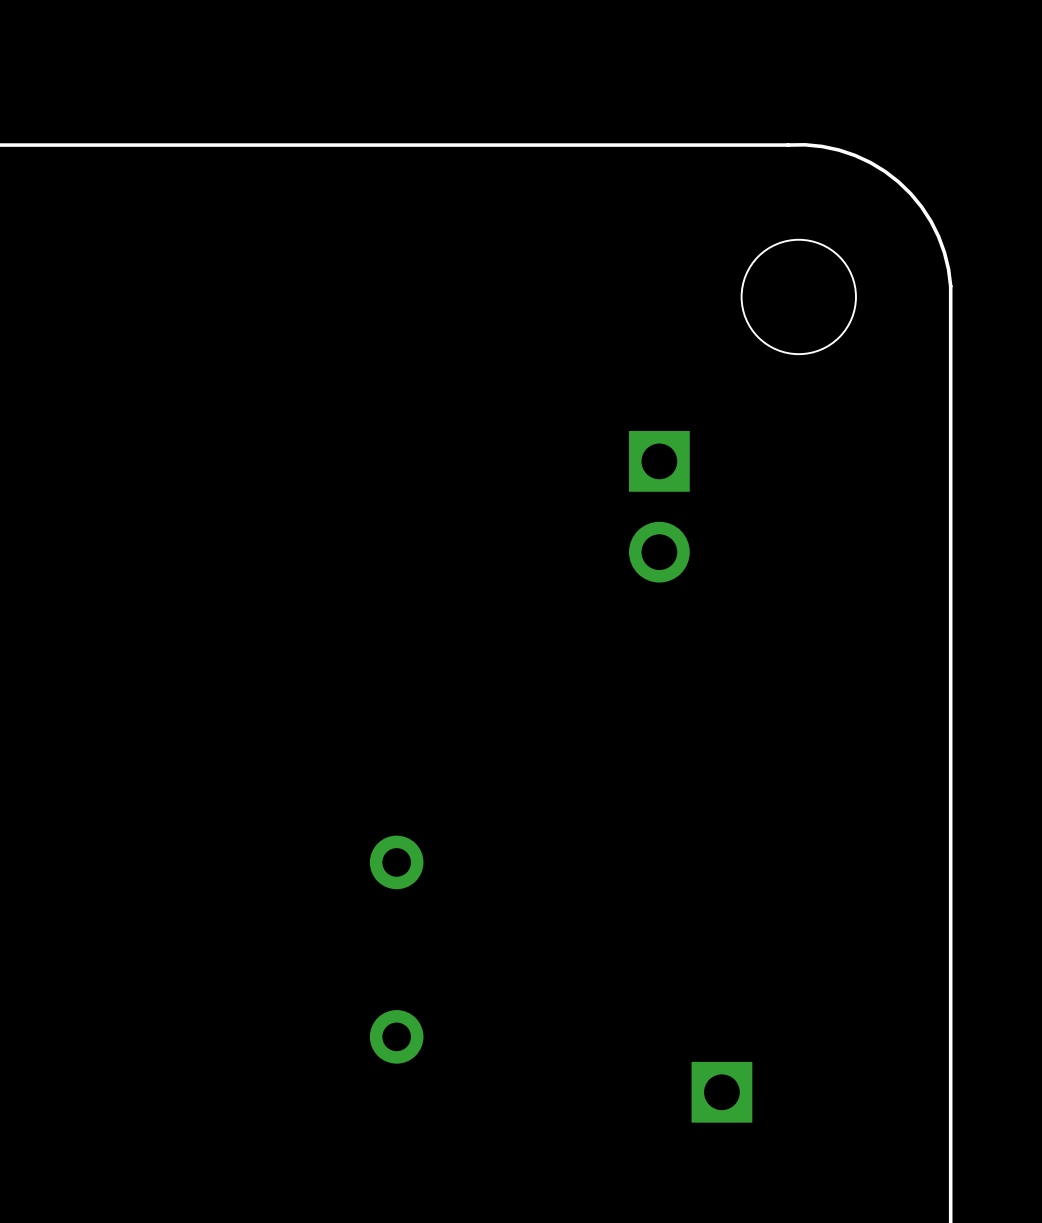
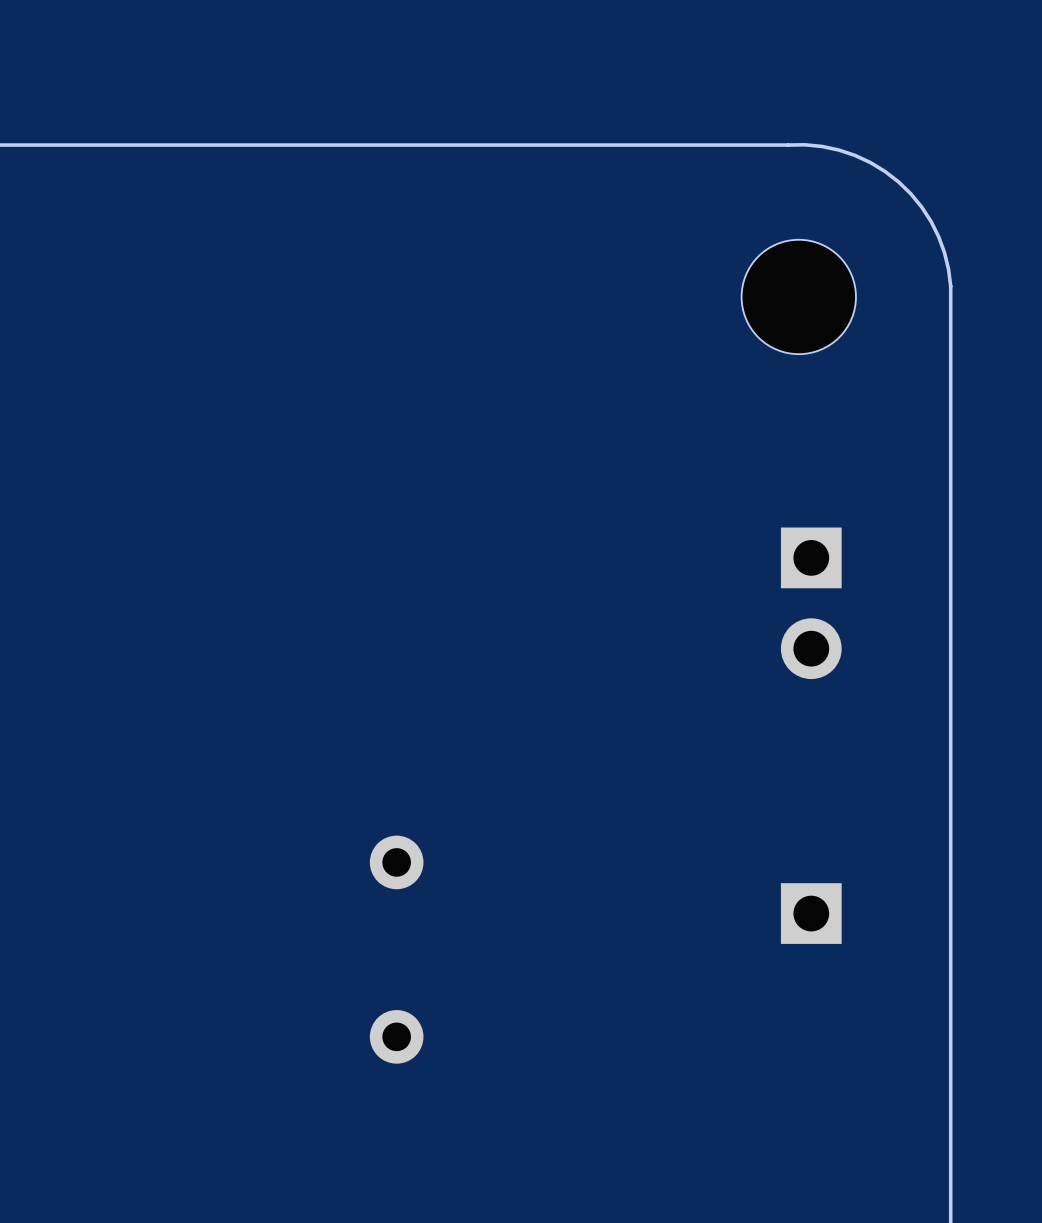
part position: (659, 506) -> (811, 603)
part position: (721, 1092) -> (811, 913)

